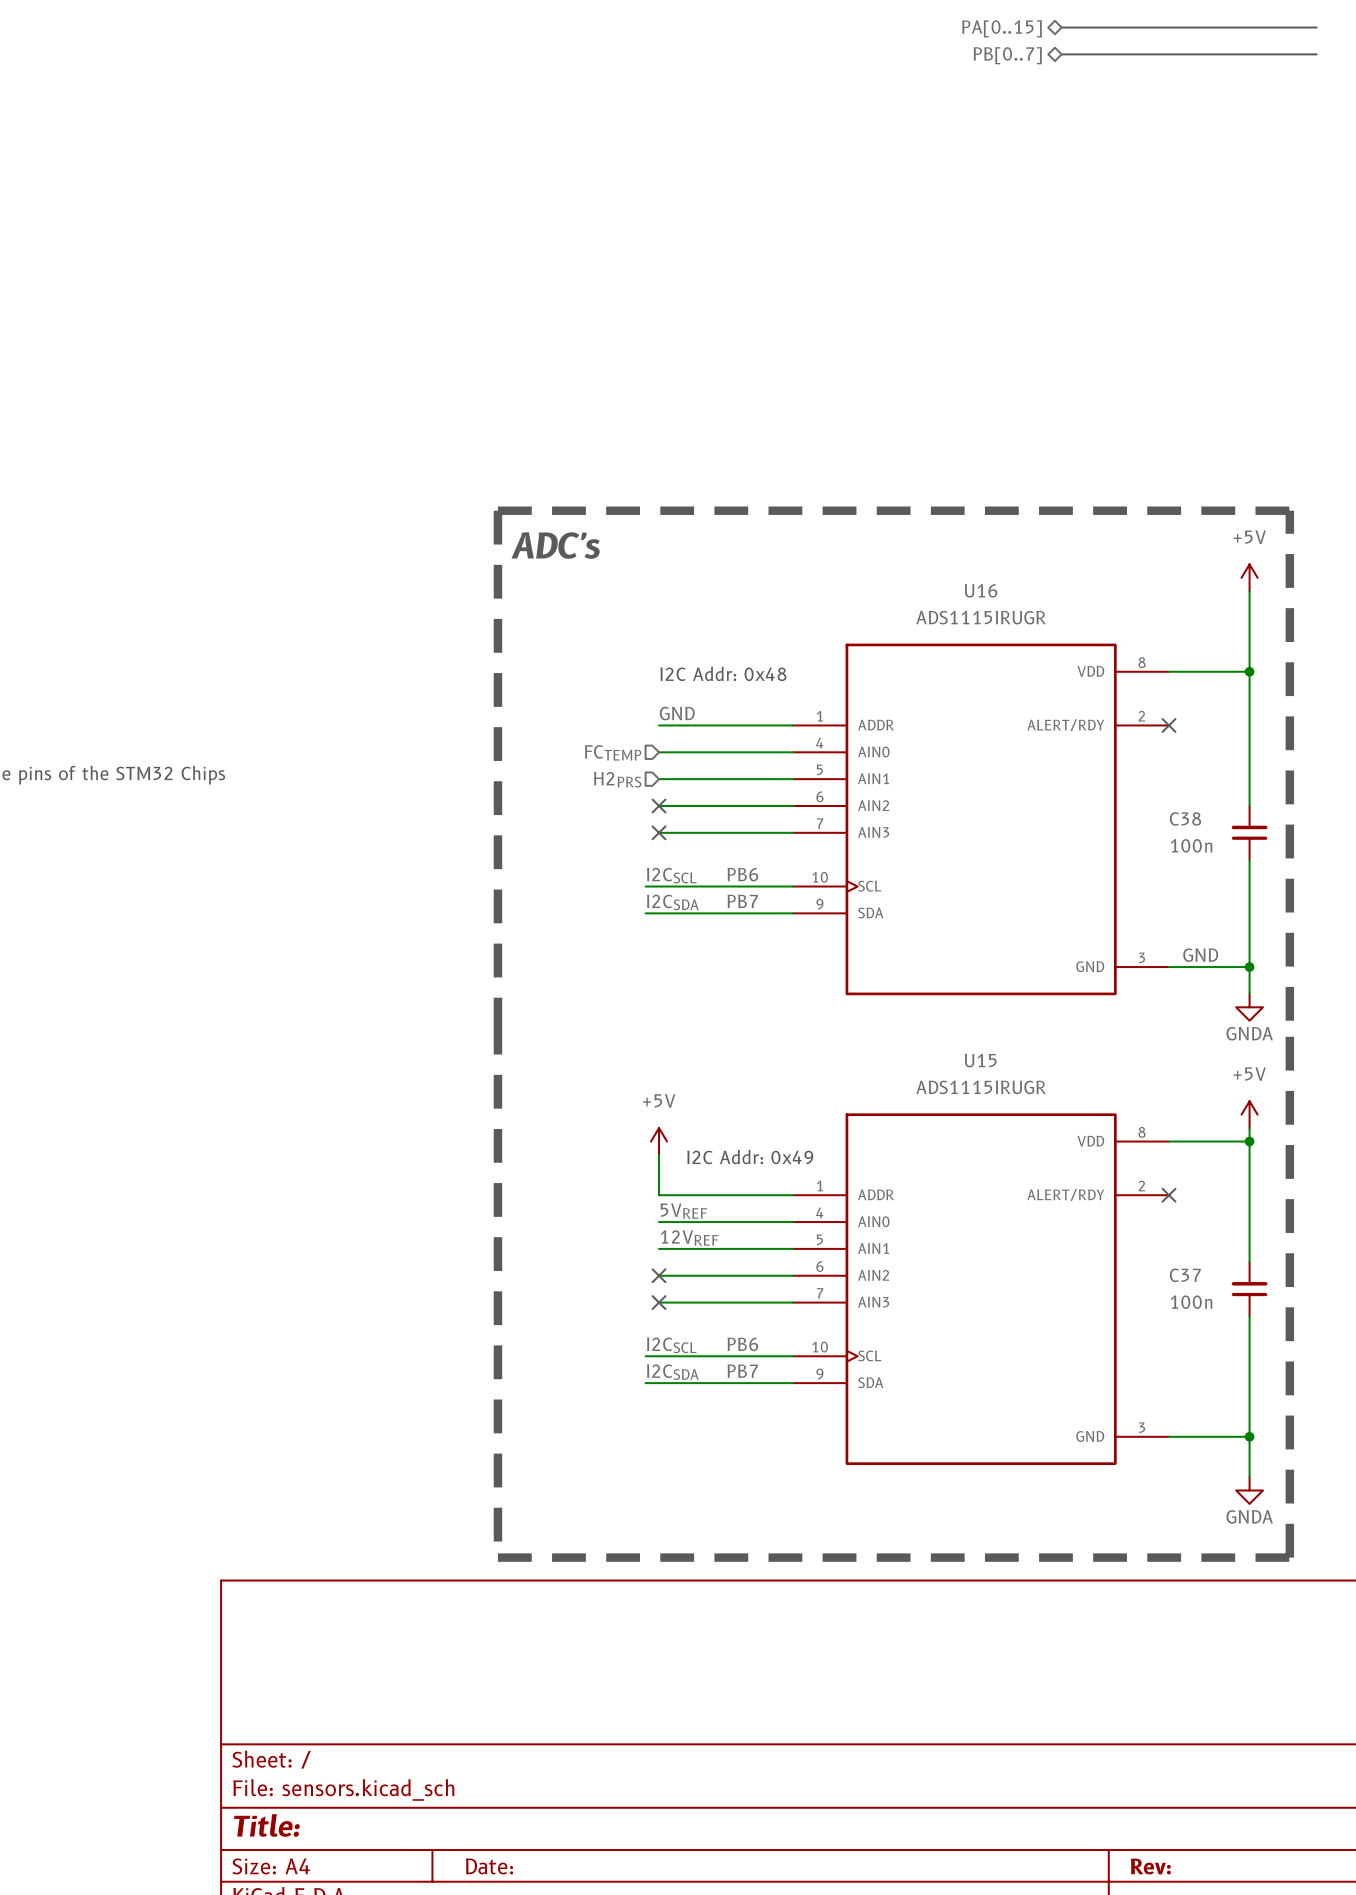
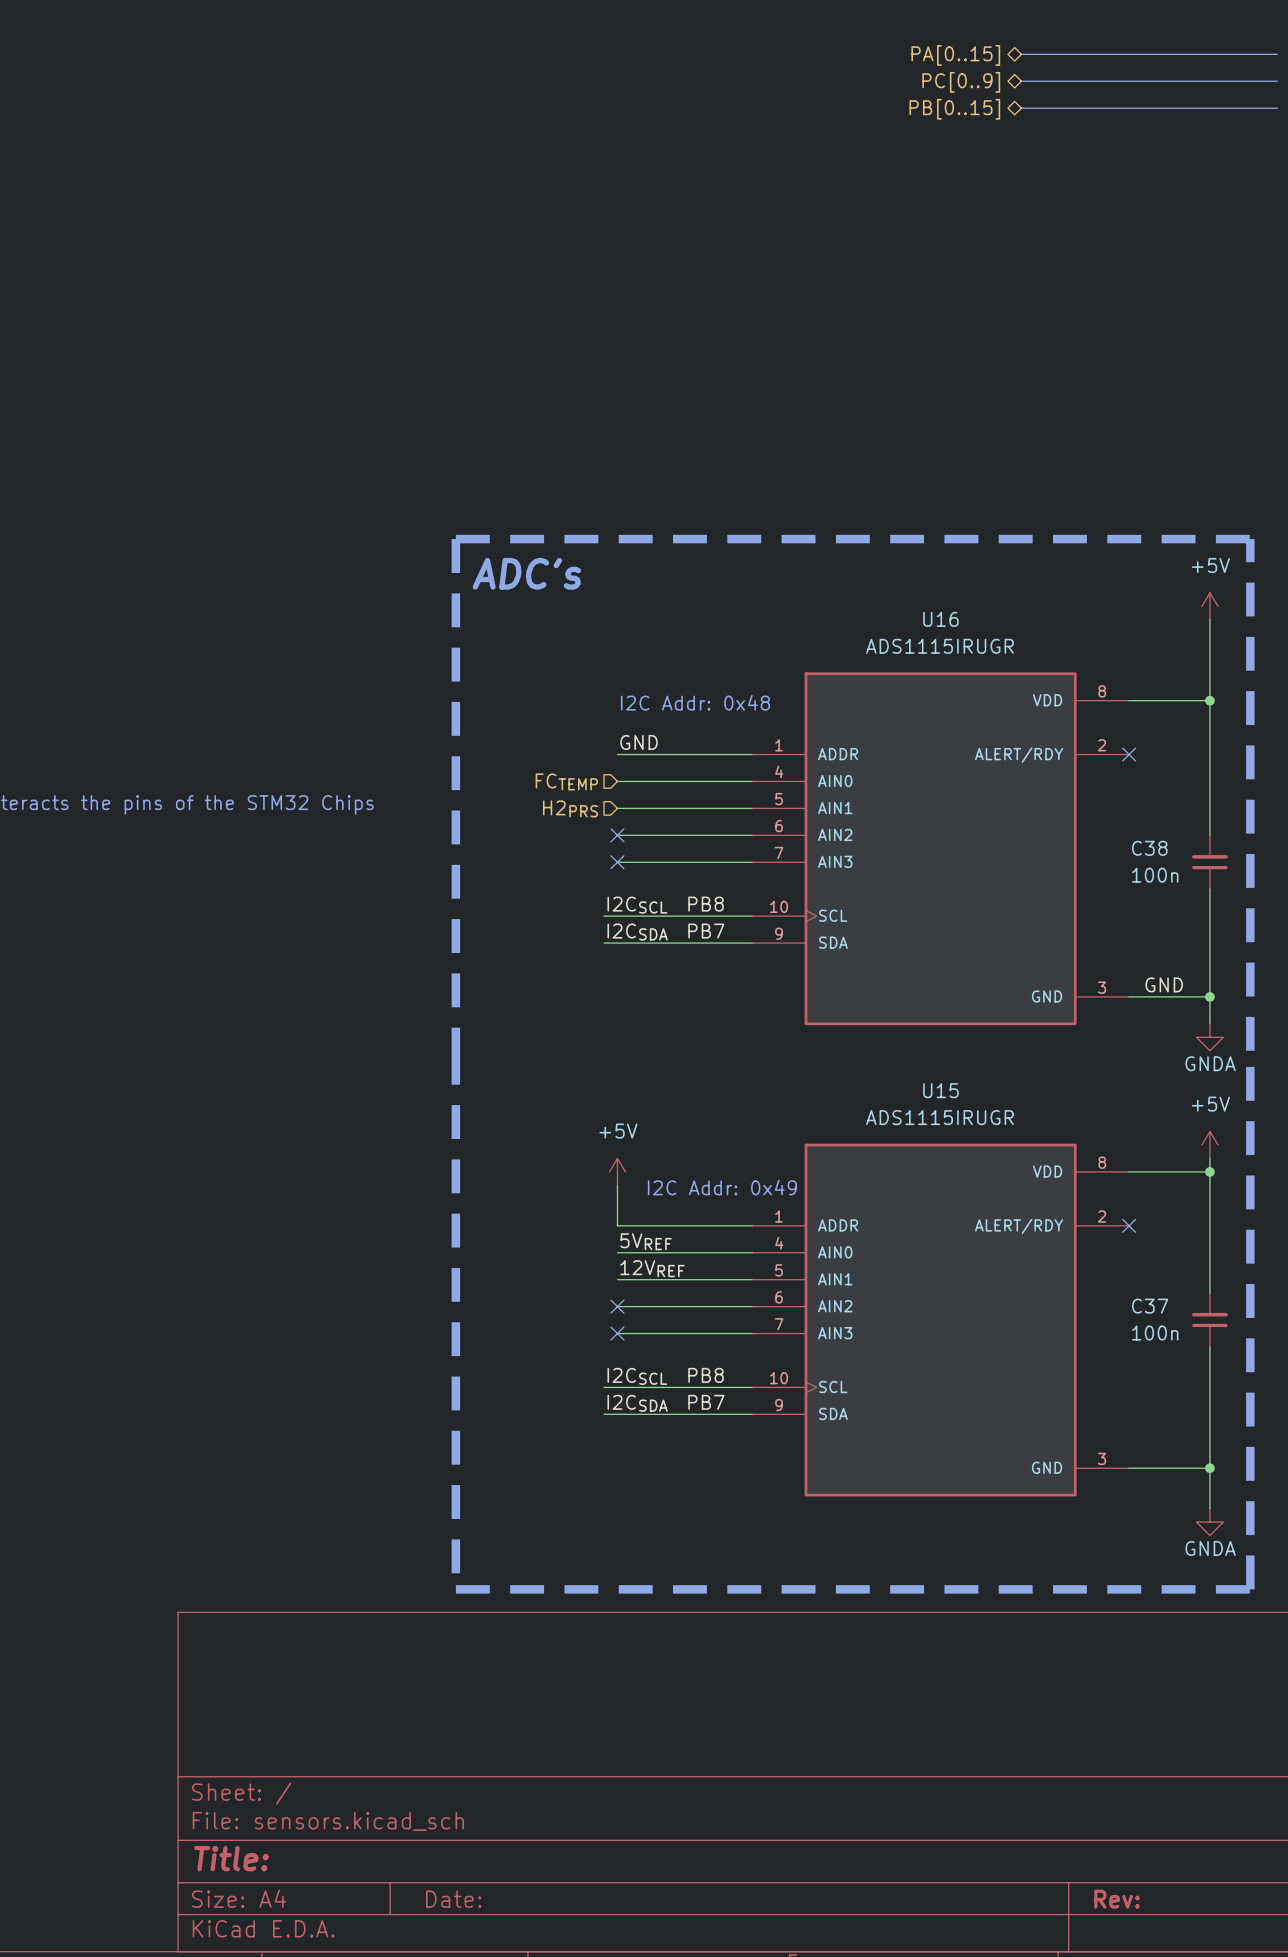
hierarchical label: PB[0..7] (1007, 55) -> PC[0..9] (961, 82)
bus: none -> (1021, 108) (1277, 108)
hierarchical label: none -> PB[0..15] (954, 109)
label: PB6 (742, 874) -> PB8 (706, 904)
label: PB6 (742, 1344) -> PB8 (706, 1375)

